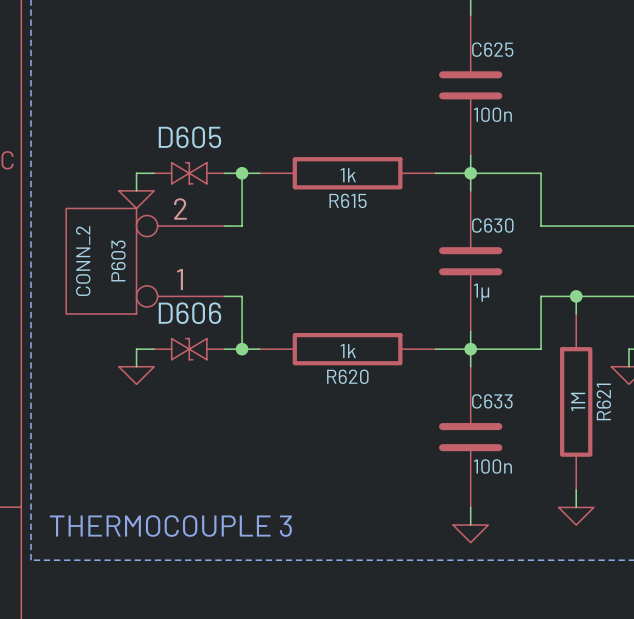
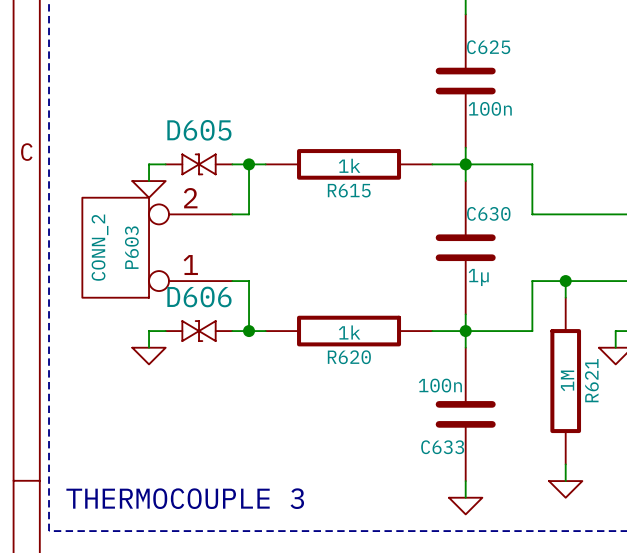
C633 name position: C633 (492, 401) -> C633 (442, 447)
C633 value position: 100n (492, 466) -> 100n (440, 385)

